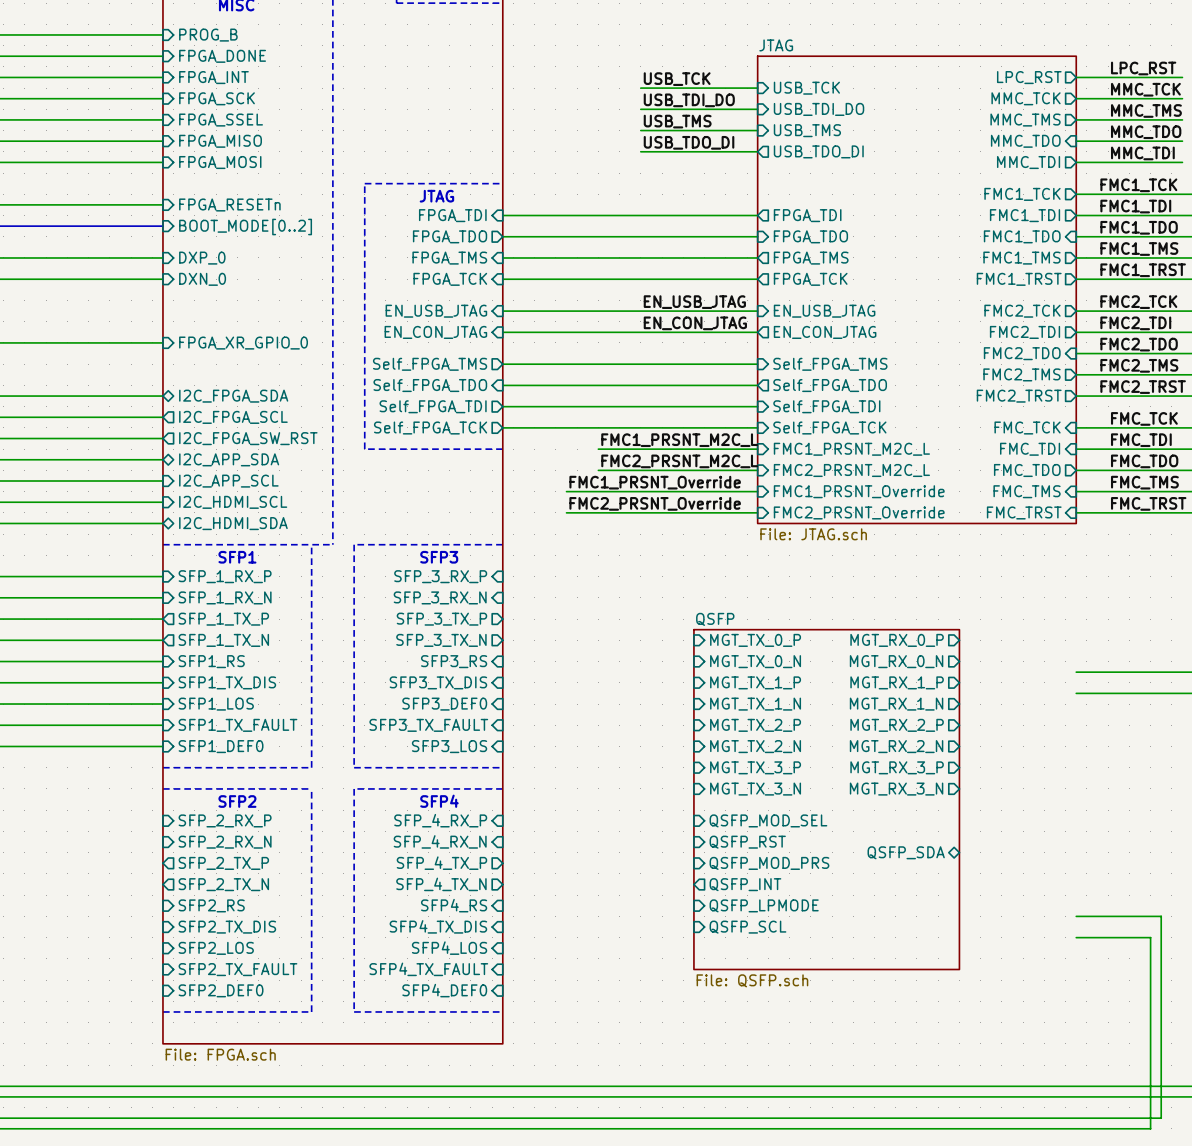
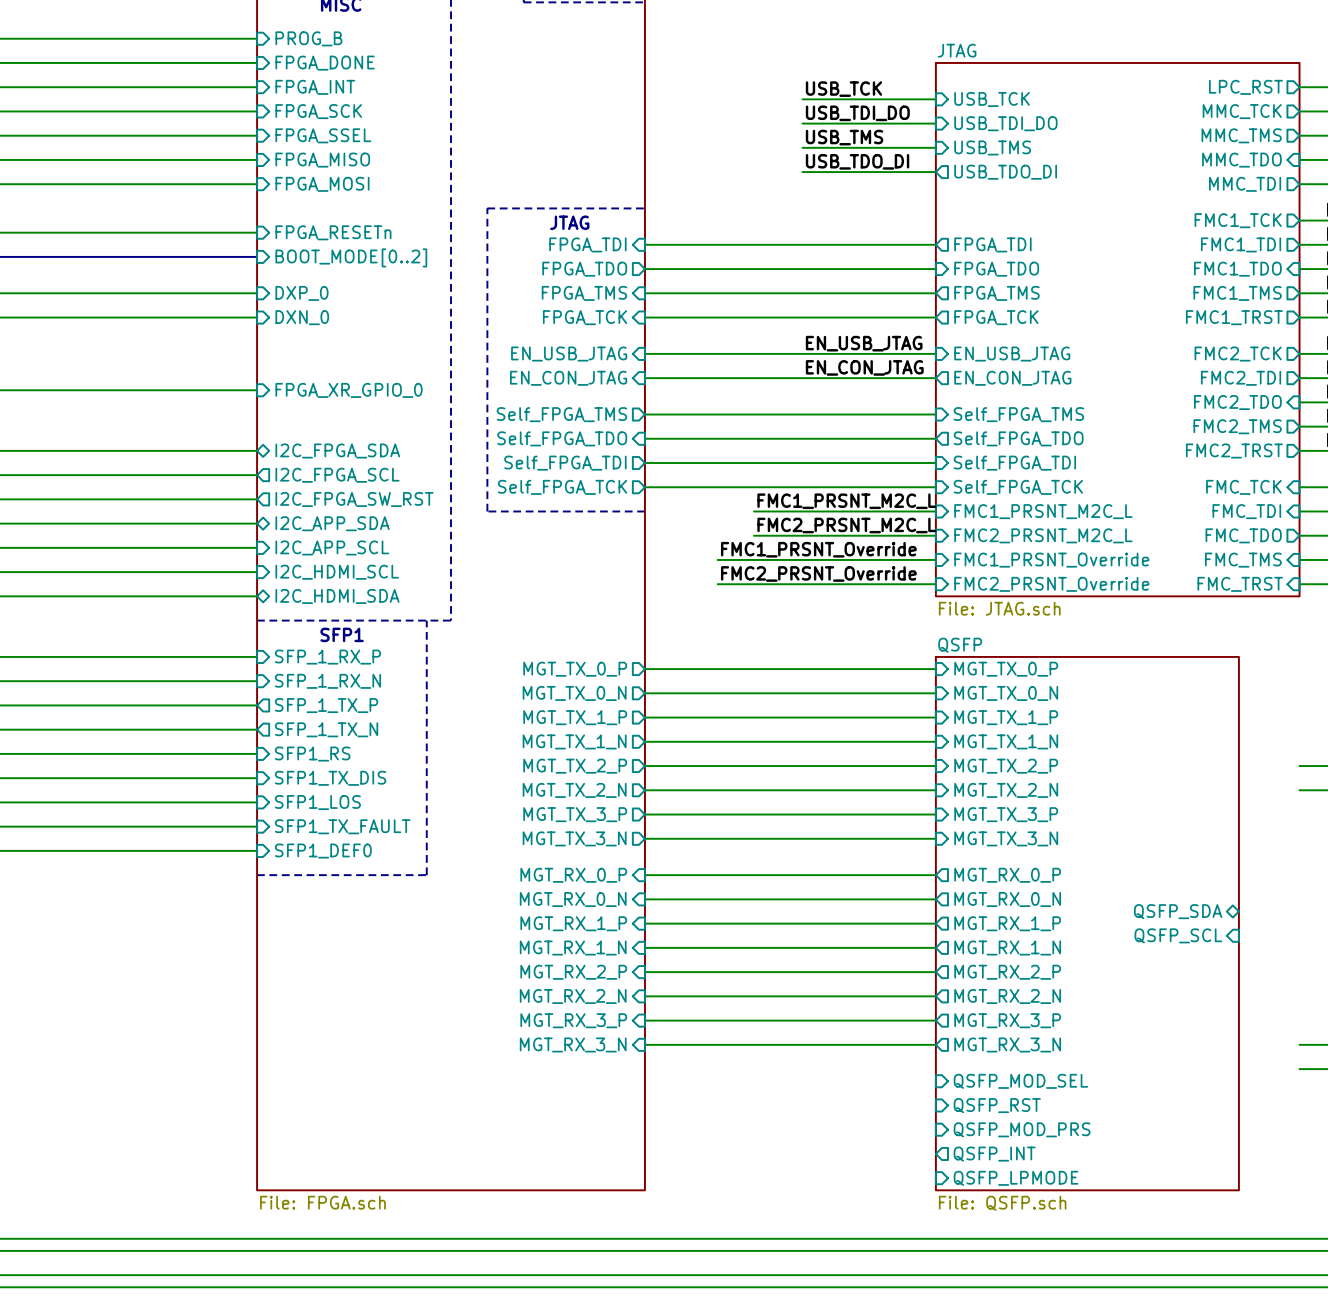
line: (502, 544) (354, 544) (354, 767) (502, 767) -> none
text: SFP3 (439, 557) -> none
sheet pin: SFP_3_RX_P (440, 576) -> none
sheet pin: none -> MGT_TX_0_P (575, 669)
wire: none -> (644, 669) (935, 669)
sheet pin: SFP_3_RX_N (440, 597) -> none
sheet pin: none -> MGT_TX_0_N (574, 693)
wire: none -> (644, 693) (935, 693)
sheet pin: SFP_3_TX_P (441, 619) -> none
sheet pin: none -> MGT_TX_1_P (575, 717)
wire: none -> (644, 717) (935, 717)
sheet pin: SFP_3_TX_N (441, 640) -> none
sheet pin position: MGT_TX_0_P (755, 640) -> MGT_TX_0_P (1006, 669)
sheet pin: MGT_RX_0_P (897, 640) -> none
wire: none -> (644, 741) (935, 741)
sheet pin: none -> MGT_TX_1_N (574, 741)
sheet pin: SFP3_RS (454, 661) -> none
sheet pin position: MGT_TX_0_N (755, 661) -> MGT_TX_0_N (1006, 693)
sheet pin: MGT_RX_0_N (896, 661) -> none
sheet pin: none -> MGT_TX_2_P (575, 766)
wire: none -> (644, 766) (935, 766)
sheet pin: SFP3_TX_DIS (438, 682) -> none
sheet pin position: MGT_TX_1_P (755, 682) -> MGT_TX_1_P (1006, 717)
sheet pin: MGT_RX_1_P (897, 682) -> none
sheet pin: none -> MGT_TX_2_N (574, 790)
wire: none -> (644, 790) (935, 790)
sheet pin: SFP3_DEF0 (444, 704) -> none
sheet pin position: MGT_TX_1_N (755, 704) -> MGT_TX_1_N (1006, 741)
sheet pin: MGT_RX_1_N (896, 704) -> none
sheet pin: none -> MGT_TX_3_P (575, 814)
wire: none -> (644, 814) (935, 814)
sheet pin: SFP3_TX_FAULT (428, 725) -> none
sheet pin position: MGT_TX_2_P (755, 725) -> MGT_TX_2_P (1006, 766)
sheet pin: MGT_RX_2_P (897, 725) -> none
sheet pin: none -> MGT_TX_3_N (574, 838)
wire: none -> (644, 838) (935, 838)
sheet pin: SFP3_LOS (449, 746) -> none
sheet pin position: MGT_TX_2_N (755, 746) -> MGT_TX_2_N (1006, 790)
sheet pin: MGT_RX_2_N (896, 746) -> none
sheet pin: none -> MGT_RX_0_P (573, 875)
wire: none -> (644, 875) (935, 875)
sheet pin position: MGT_TX_3_P (755, 767) -> MGT_TX_3_P (1006, 814)
sheet pin: none -> MGT_RX_0_P (1007, 875)
sheet pin: MGT_RX_3_P (897, 767) -> none
line: (162, 788) (311, 788) (311, 1011) (162, 1011) -> none
line: (502, 788) (354, 788) (354, 1011) (502, 1011) -> none
wire: none -> (644, 899) (935, 899)
sheet pin: none -> MGT_RX_0_N (573, 899)
sheet pin position: MGT_TX_3_N (755, 789) -> MGT_TX_3_N (1006, 838)
sheet pin: none -> MGT_RX_0_N (1007, 899)
sheet pin: MGT_RX_3_N (896, 789) -> none
sheet QSFP: File: QSFP.sch (826, 799) -> none
text: SFP2 (237, 801) -> none
text: SFP4 (439, 801) -> none
sheet pin: none -> MGT_RX_1_P (573, 923)
wire: none -> (644, 923) (935, 923)
sheet pin: none -> MGT_RX_1_P (1007, 923)
sheet QSFP: none -> File: QSFP.sch (1087, 923)
sheet pin: SFP_2_RX_P (225, 820) -> none
sheet pin: SFP_4_RX_P (440, 820) -> none
sheet pin position: QSFP_MOD_SEL (768, 820) -> QSFP_MOD_SEL (1020, 1081)
sheet pin: none -> QSFP_SCL (1178, 935)
sheet pin: none -> MGT_RX_1_N (573, 948)
wire: none -> (644, 947) (935, 947)
sheet pin: none -> MGT_RX_1_N (1007, 948)
sheet pin: SFP_4_RX_N (440, 841) -> none
sheet pin: SFP_2_RX_N (225, 842) -> none
sheet pin position: QSFP_RST (747, 842) -> QSFP_RST (997, 1105)
sheet pin: none -> MGT_RX_2_P (573, 972)
wire: none -> (644, 972) (935, 972)
sheet pin: none -> MGT_RX_2_P (1007, 972)
sheet pin position: QSFP_SDA (906, 852) -> QSFP_SDA (1178, 911)
sheet pin: SFP_2_TX_P (223, 863) -> none
sheet pin: SFP_4_TX_P (441, 863) -> none
sheet pin position: QSFP_MOD_PRS (769, 863) -> QSFP_MOD_PRS (1022, 1129)
wire: none -> (644, 996) (935, 996)
sheet pin: none -> MGT_RX_2_N (573, 996)
sheet pin: none -> MGT_RX_2_N (1007, 996)
sheet pin: SFP_2_TX_N (223, 884) -> none
sheet pin: SFP_4_TX_N (441, 884) -> none
sheet pin position: QSFP_INT (745, 884) -> QSFP_INT (994, 1154)
sheet pin: none -> MGT_RX_3_P (573, 1020)
wire: none -> (644, 1020) (935, 1020)
sheet pin: none -> MGT_RX_3_P (1007, 1020)
sheet pin: SFP2_RS (211, 905) -> none
sheet pin: SFP4_RS (454, 905) -> none
sheet pin position: QSFP_LPMODE (764, 905) -> QSFP_LPMODE (1016, 1178)
sheet pin: none -> MGT_RX_3_N (573, 1044)
wire: none -> (644, 1044) (935, 1044)
sheet pin: none -> MGT_RX_3_N (1007, 1044)
sheet pin: SFP4_TX_DIS (438, 926) -> none
sheet pin: SFP2_TX_DIS (227, 927) -> none
sheet pin: QSFP_SCL (747, 927) -> none
sheet pin: SFP2_LOS (216, 948) -> none
sheet pin: SFP4_LOS (449, 948) -> none
sheet pin: SFP2_TX_FAULT (237, 969) -> none
sheet pin: SFP4_TX_FAULT (428, 969) -> none
sheet pin: SFP2_DEF0 (221, 990) -> none
sheet pin: SFP4_DEF0 (444, 990) -> none

